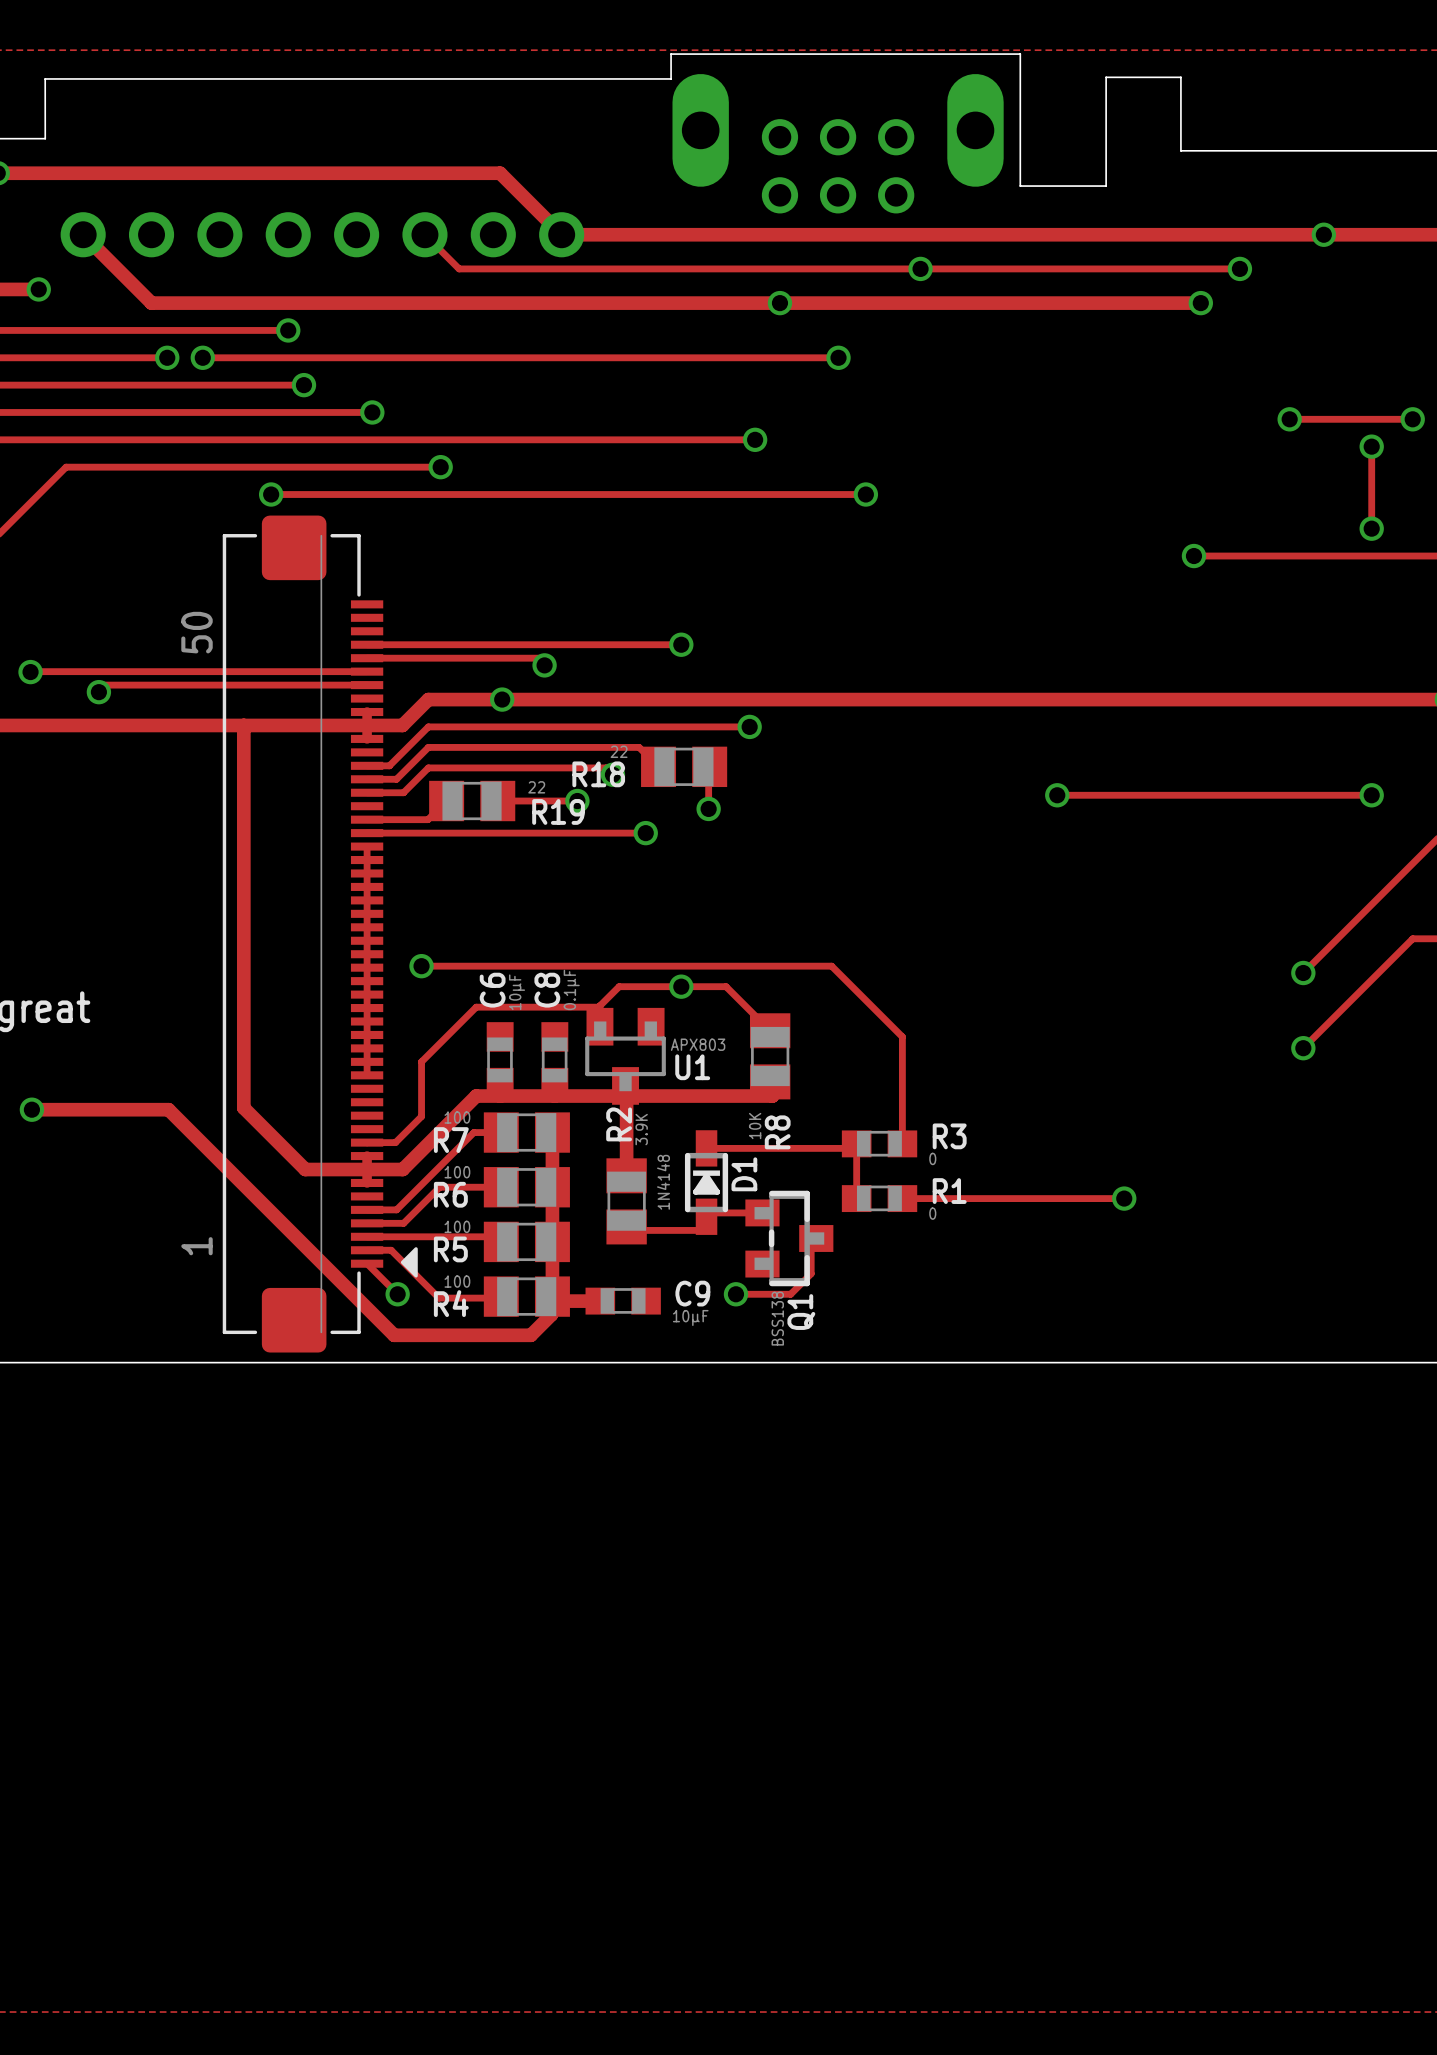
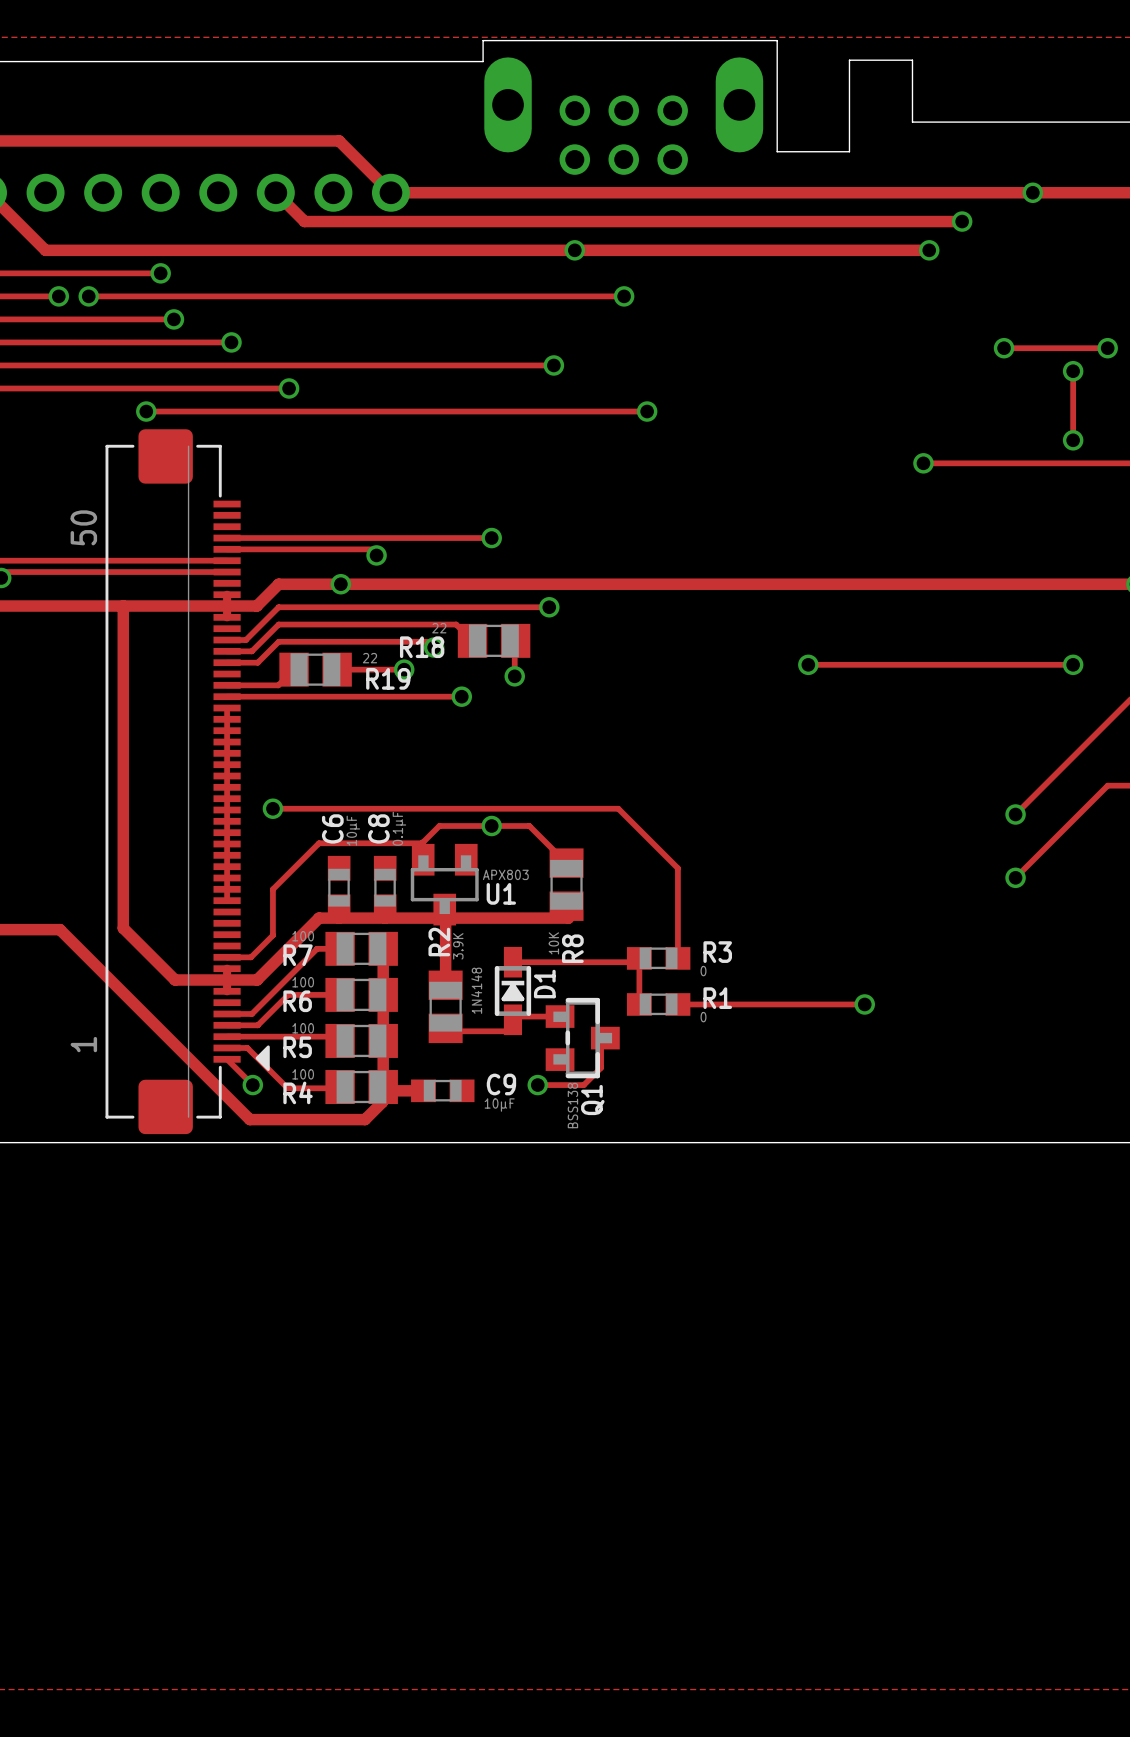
track width: thin (424, 234) (459, 268) (1239, 268) -> thick (275, 192) (304, 221) (962, 221)
via: (920, 268) -> none

